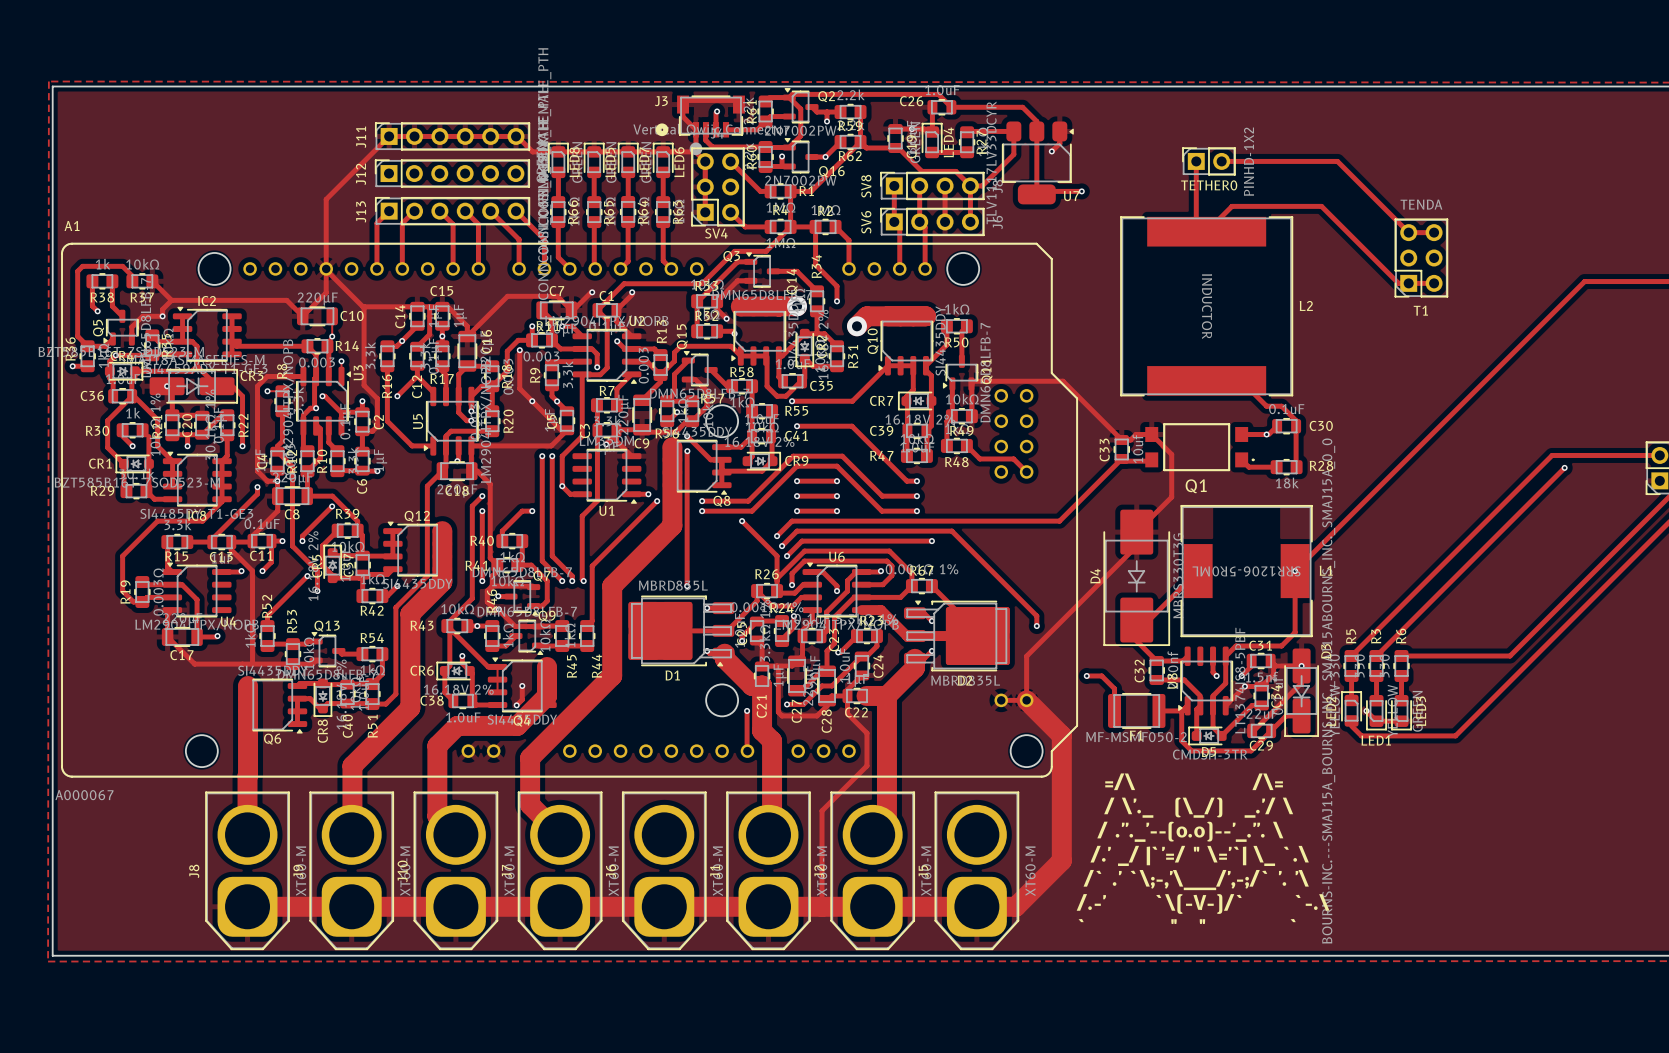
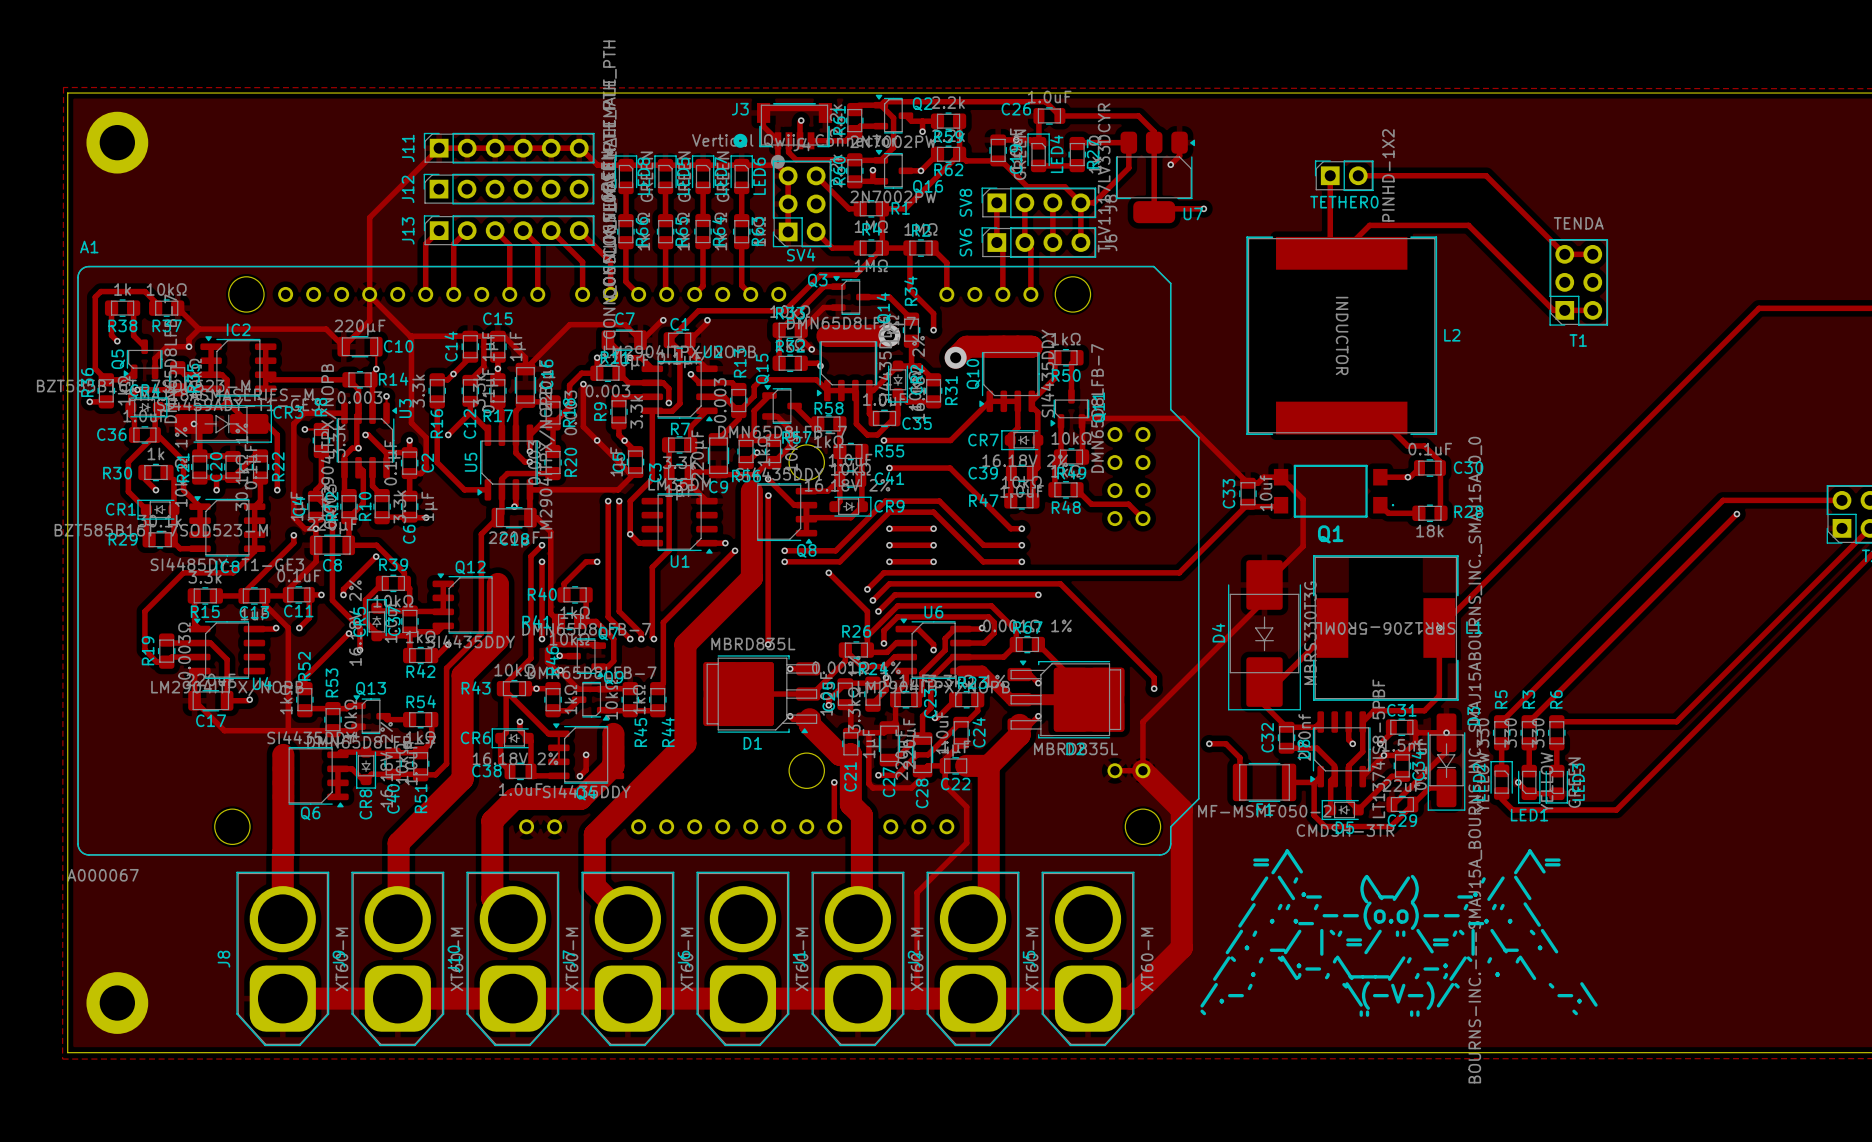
part: none -> (117, 142)
part: none -> (117, 1003)

